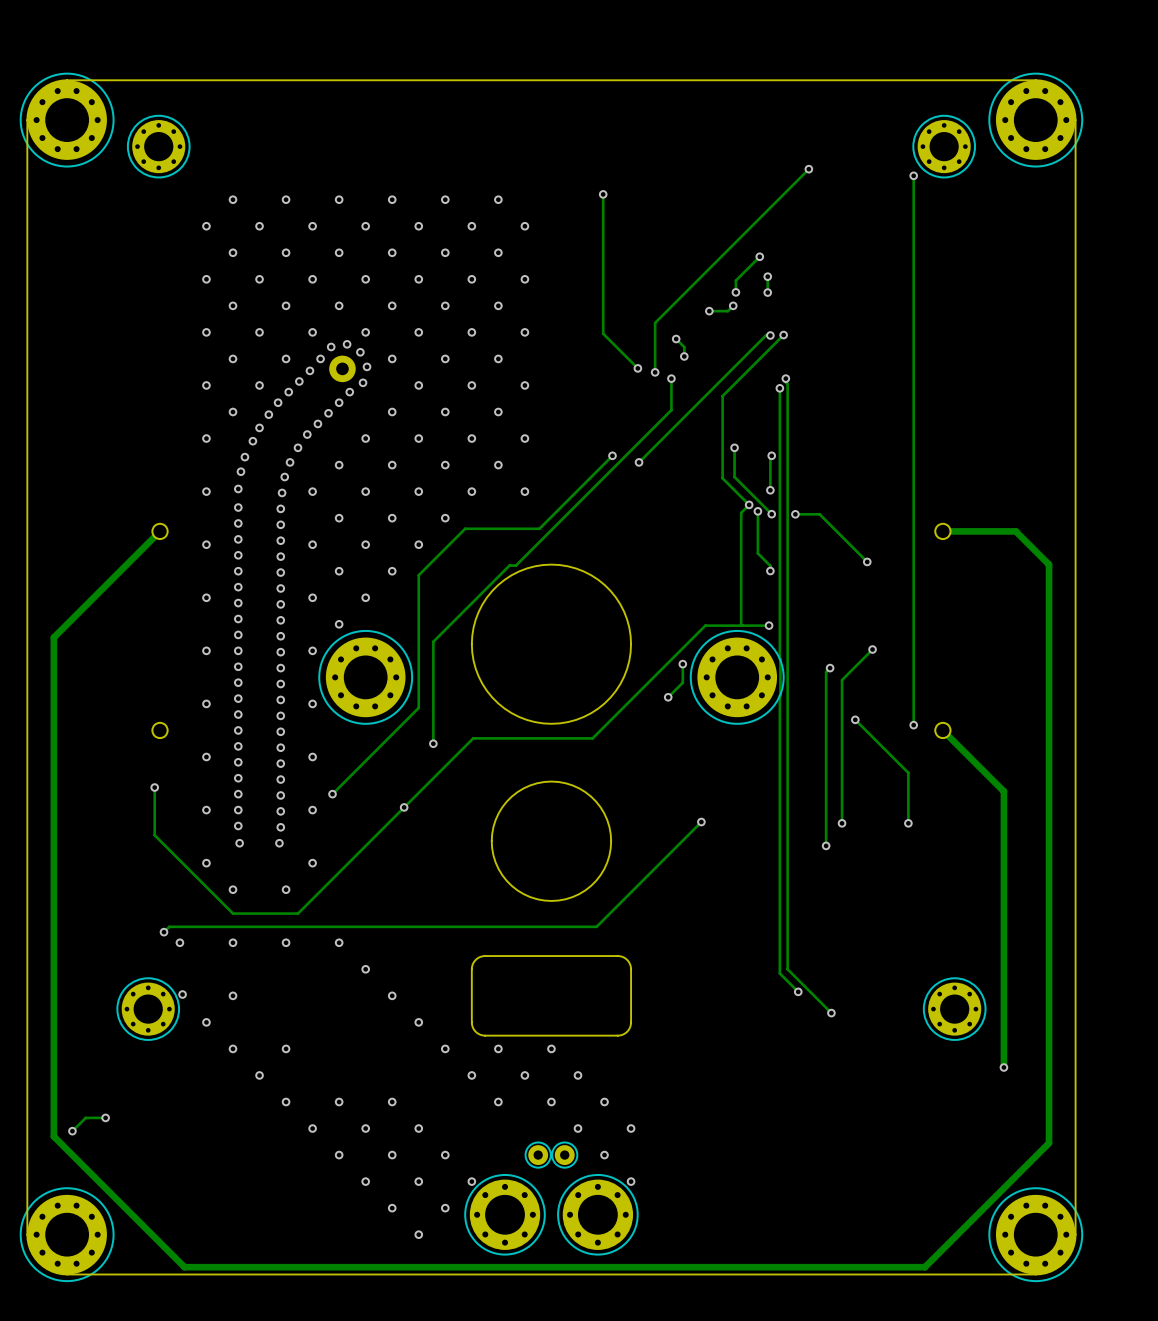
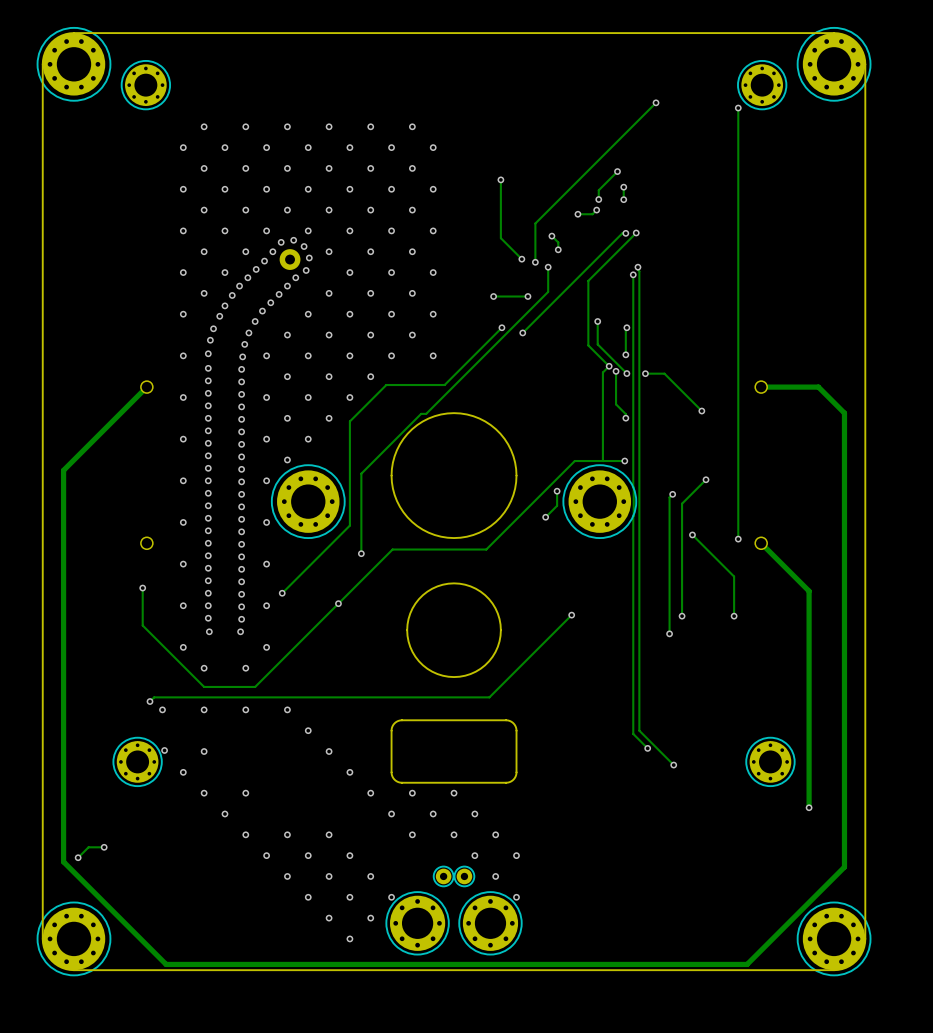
track: (603, 194) (603, 333) (611, 341) -> (500, 179) (500, 238)
via position: (603, 194) -> (500, 179)
via: none -> (493, 296)
track: none -> (527, 296) (493, 296)
via: none -> (527, 296)

